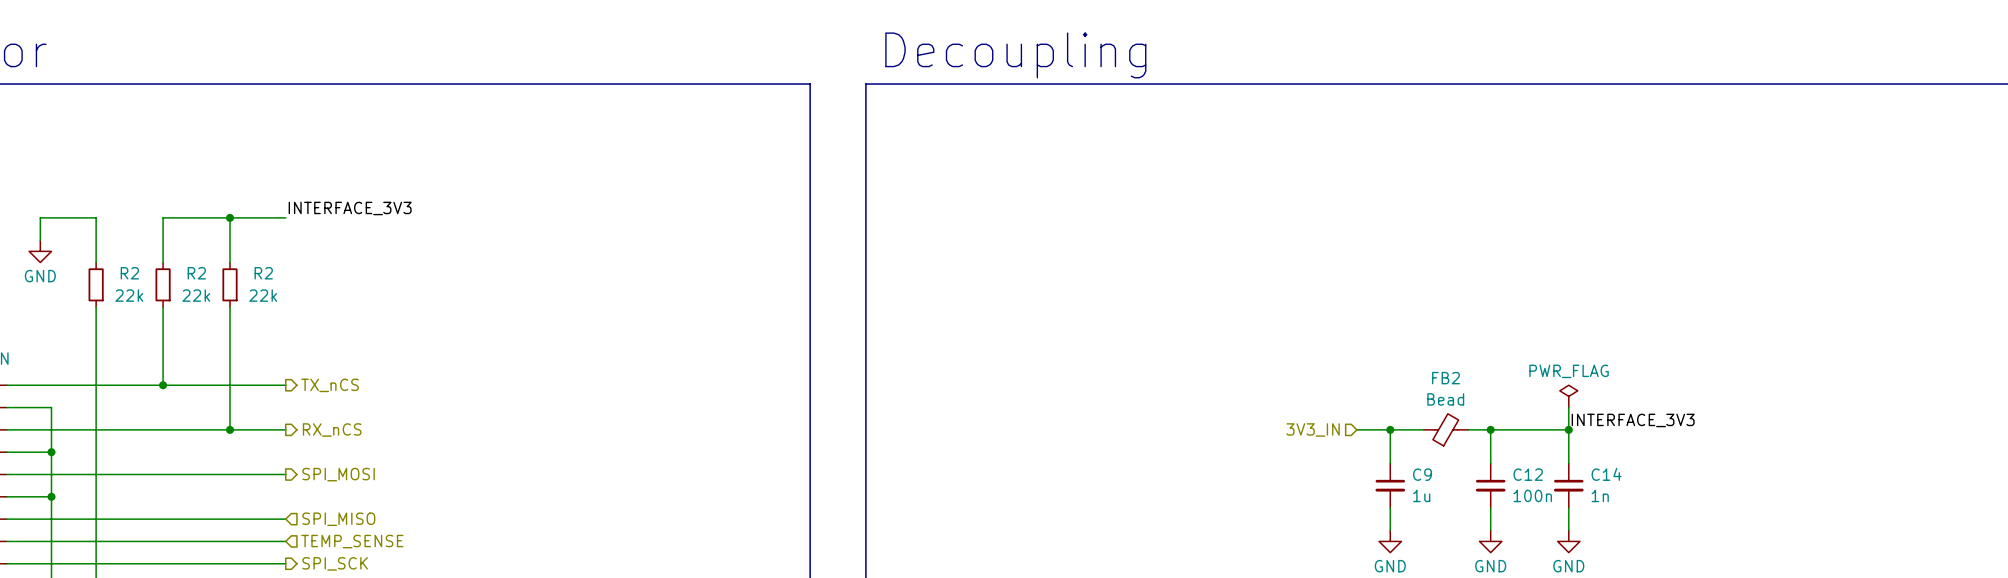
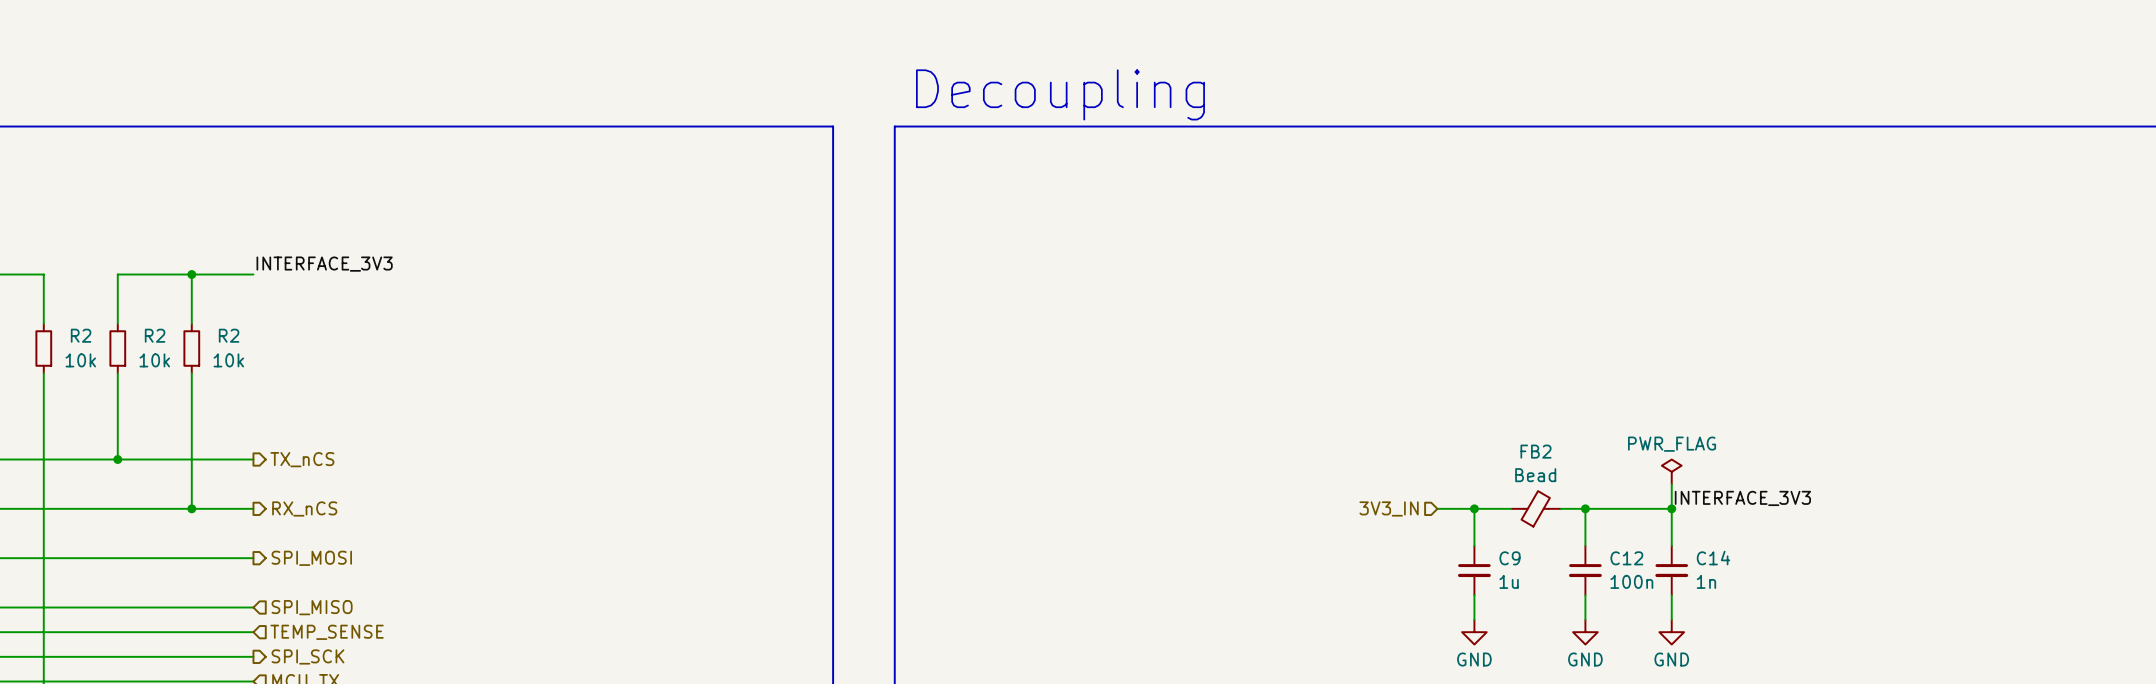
R2 value: 22k (129, 295) -> 10k (80, 360)
R2 value: 22k (196, 295) -> 10k (154, 360)
R2 value: 22k (263, 295) -> 10k (228, 360)

